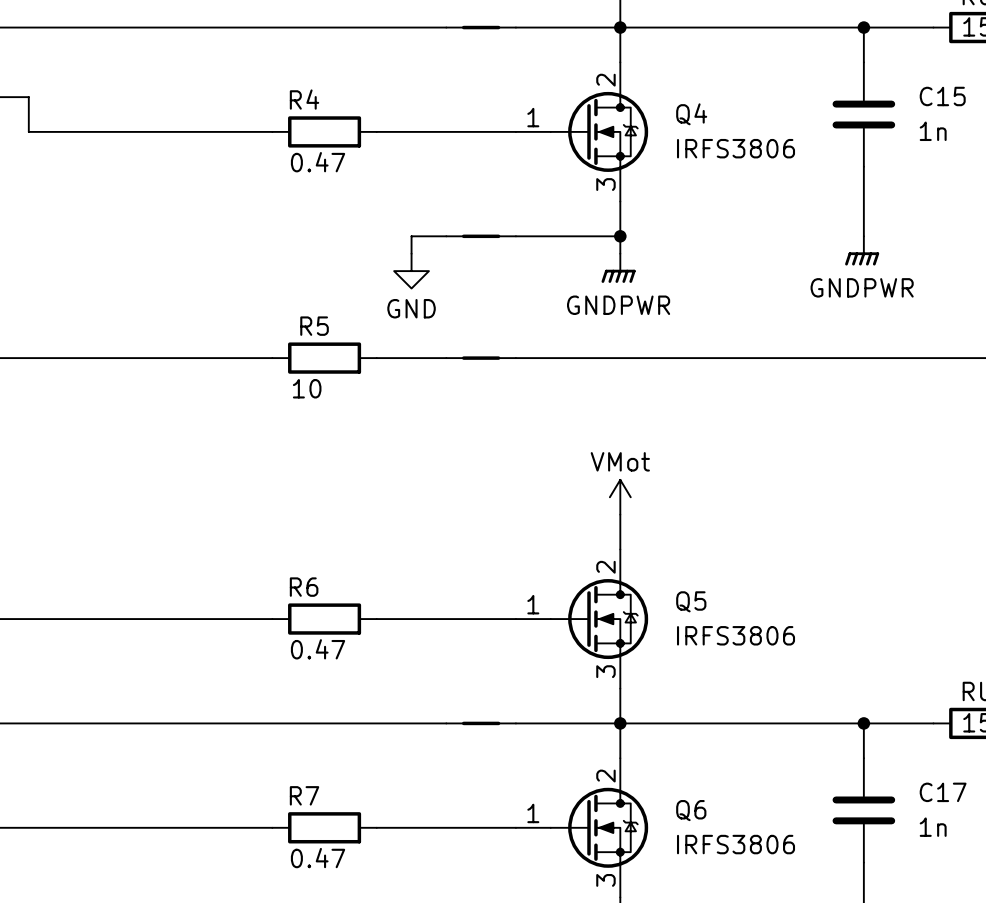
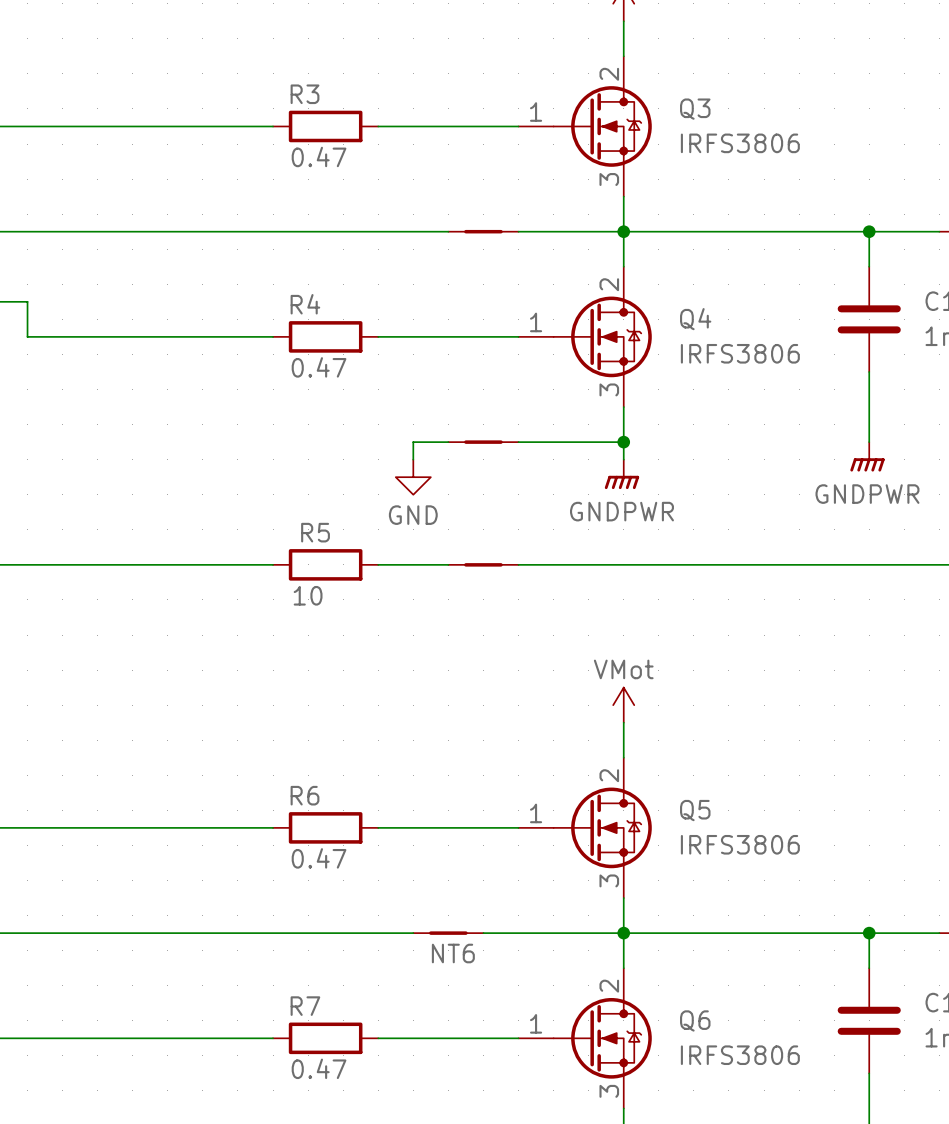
NT6: none -> (448, 933)
part: (481, 723) -> none

